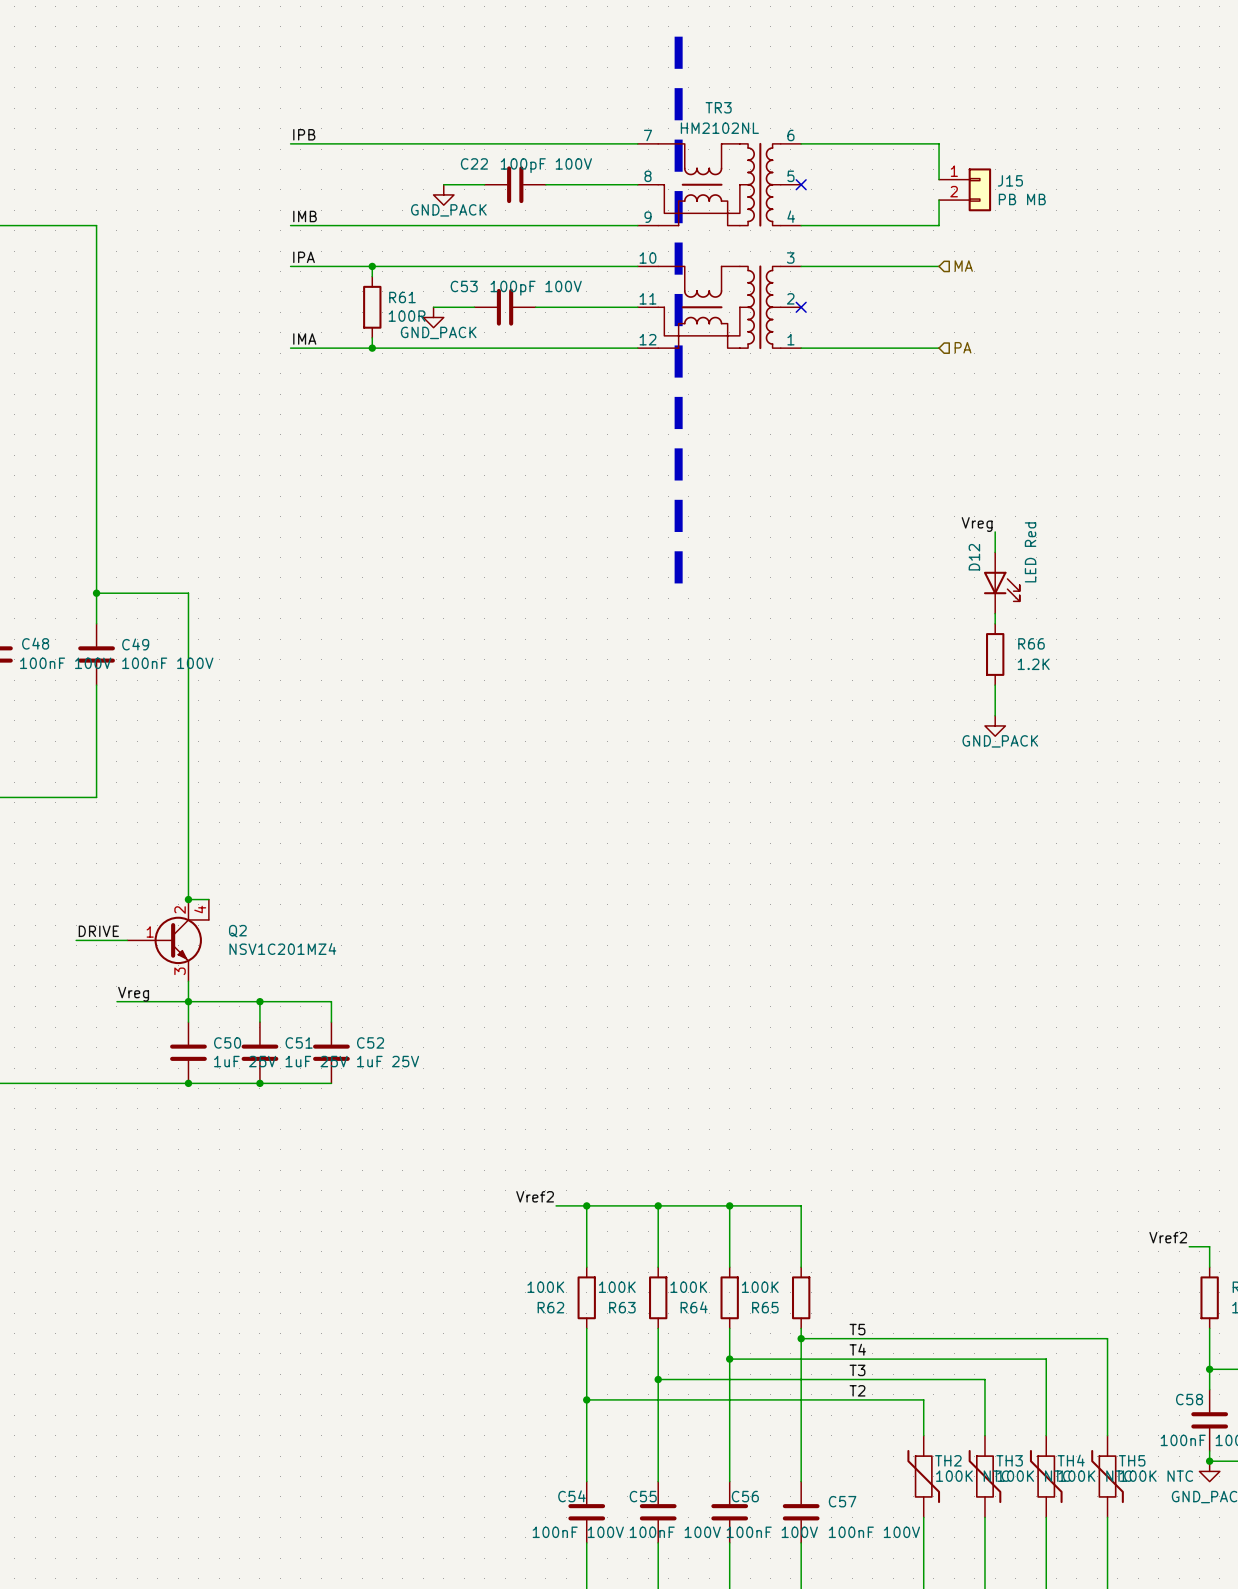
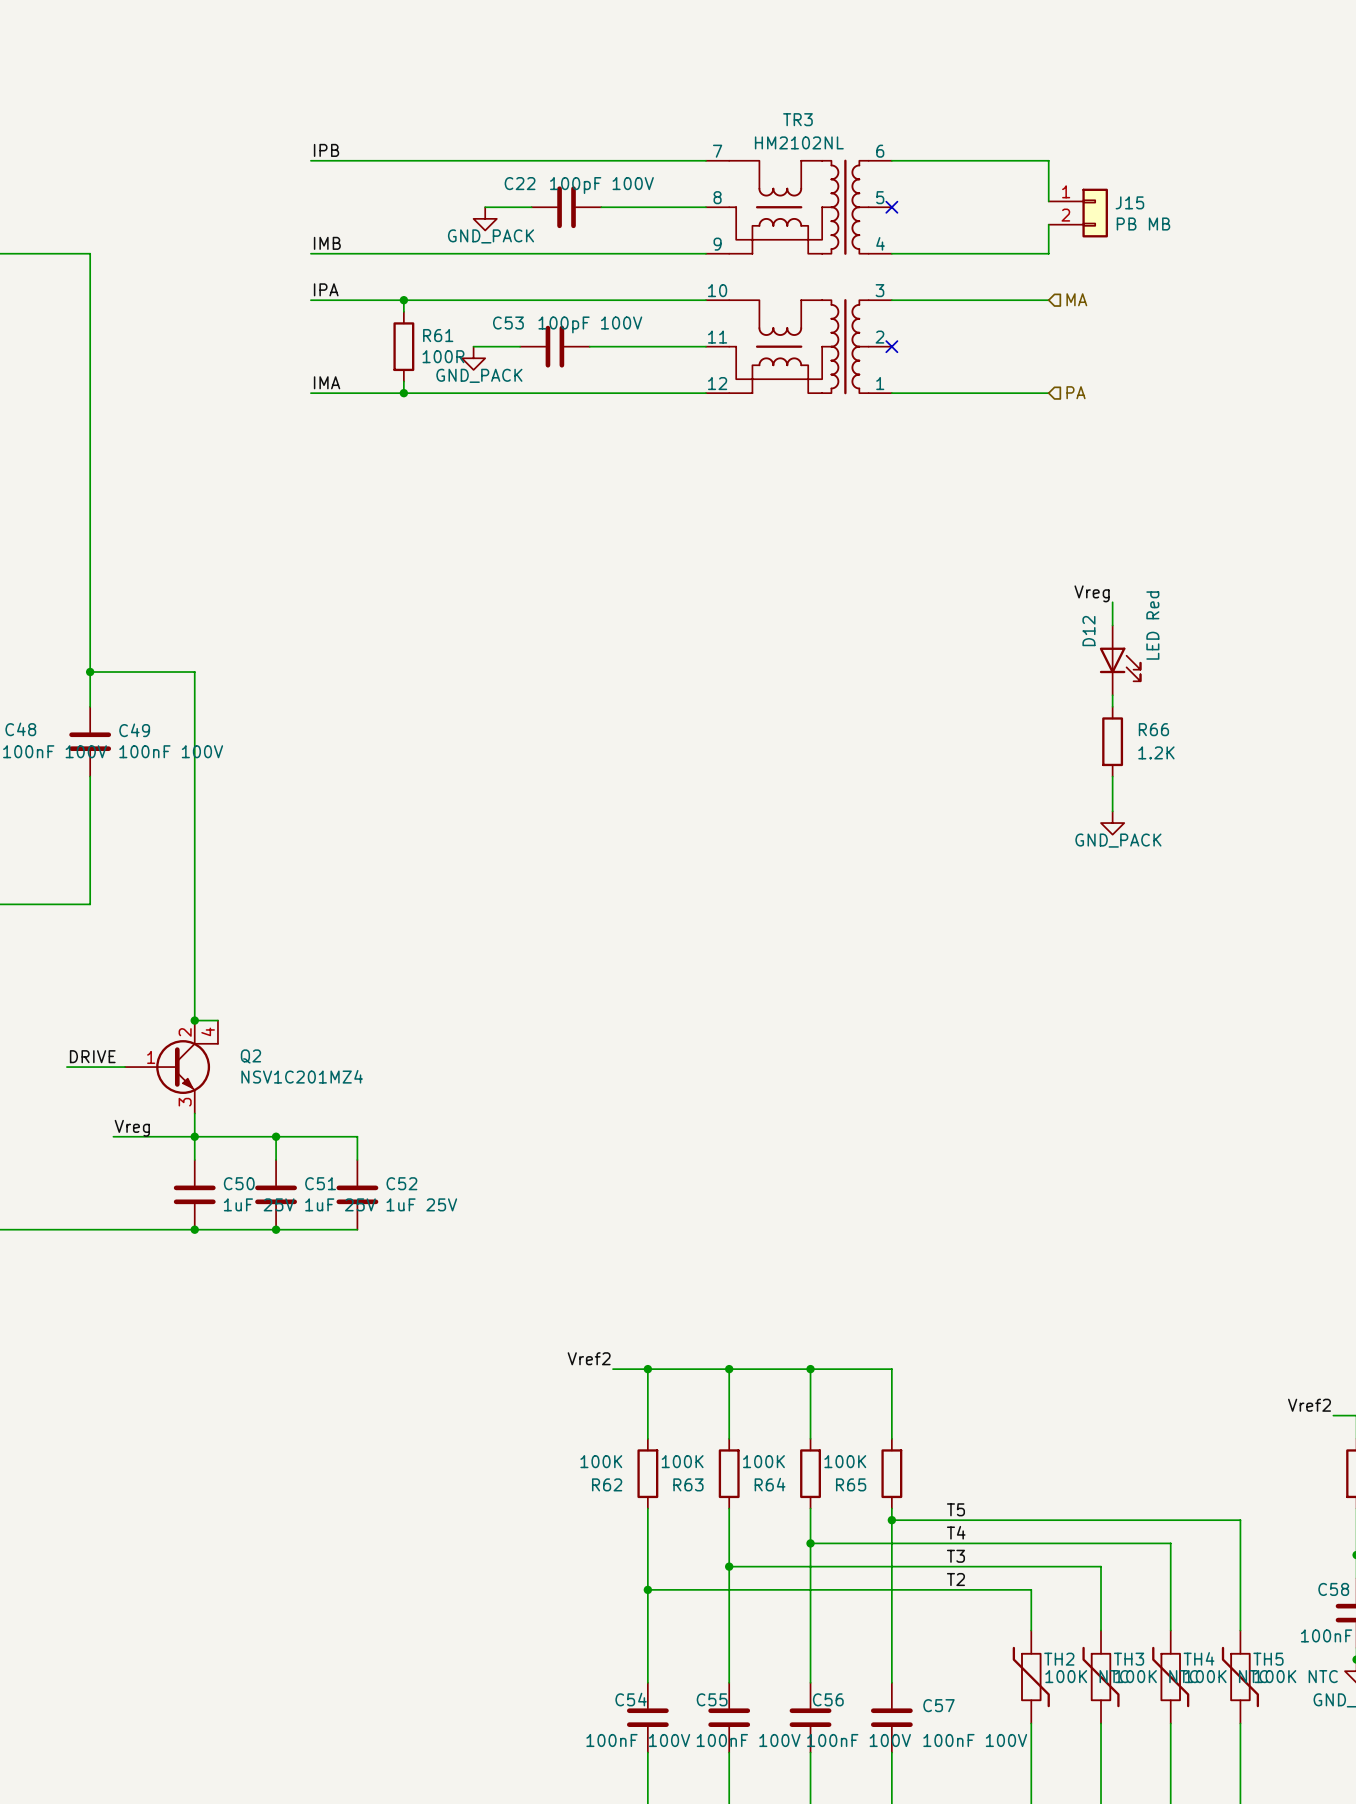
line: (678, 36) (678, 588) -> none

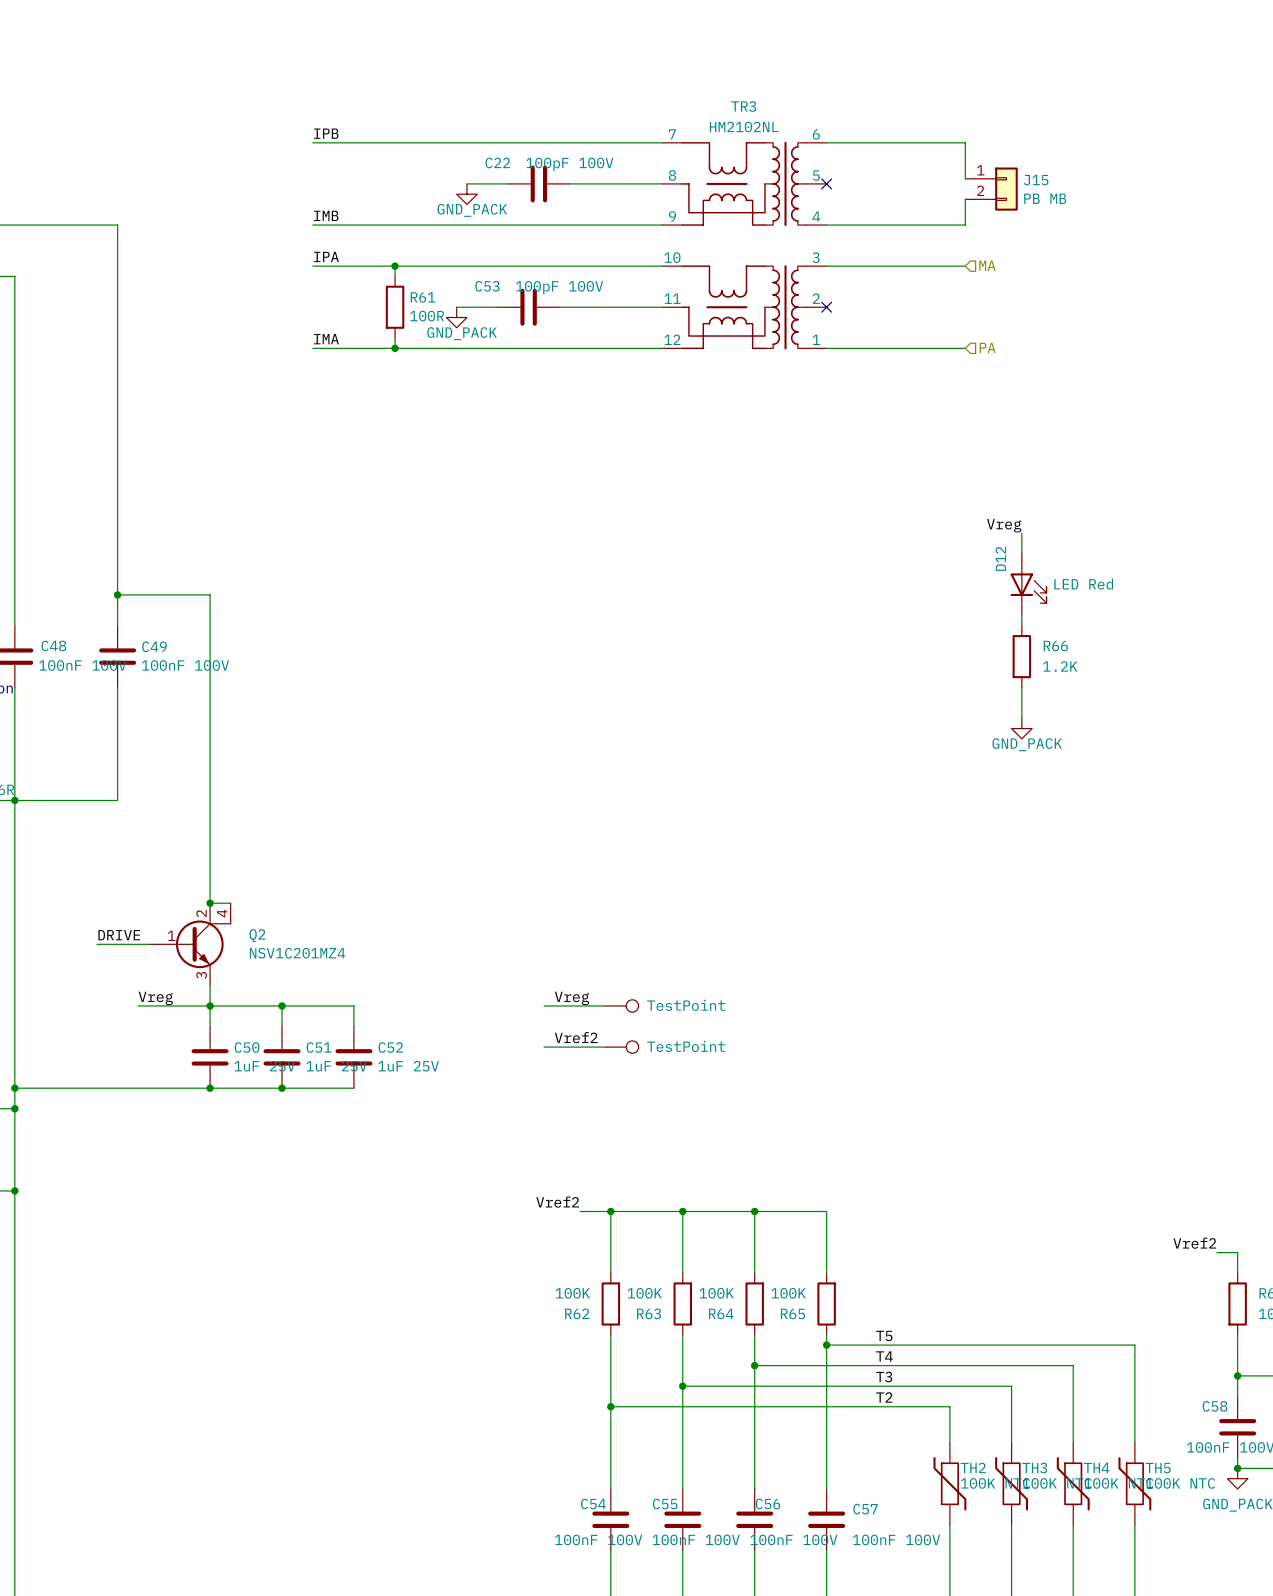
D12 value rotation: 0° (1152, 625) -> 90° clockwise (1083, 584)
label: none -> Vreg (571, 998)
wire: none -> (544, 1005) (605, 1005)
part: none -> TestPoint (622, 1005)
label: none -> Vref2 (576, 1037)
wire: none -> (544, 1047) (605, 1047)
part: none -> TestPoint (622, 1047)

